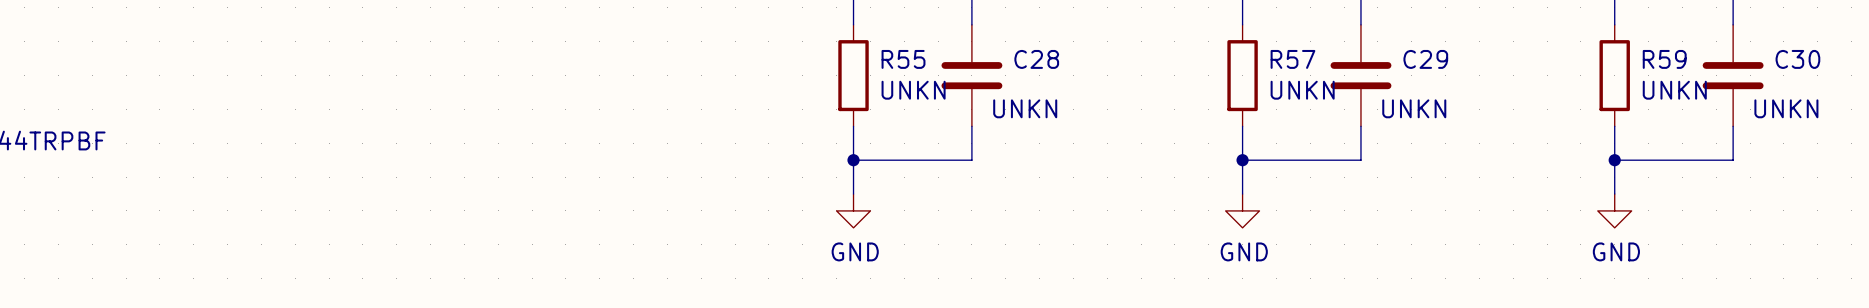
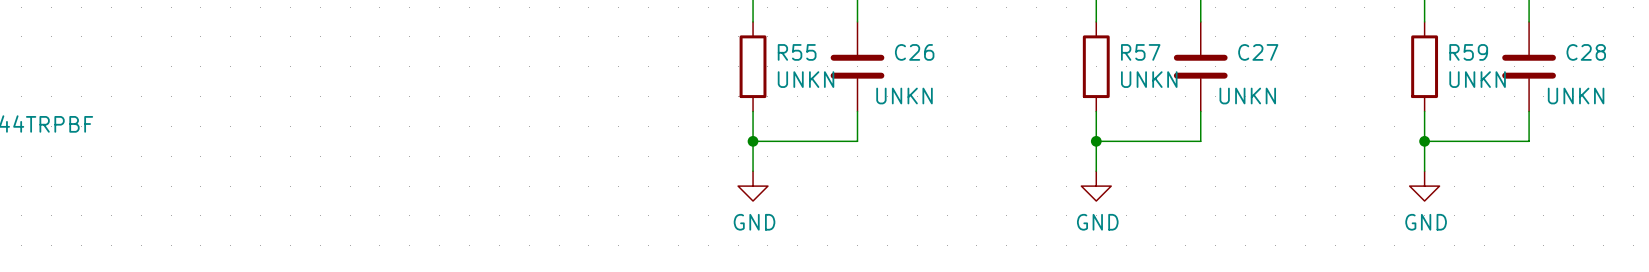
C28 name: C28 (1036, 59) -> C26 (914, 52)
C29 name: C29 (1425, 59) -> C27 (1258, 52)
C30 name: C30 (1797, 59) -> C28 (1586, 52)

